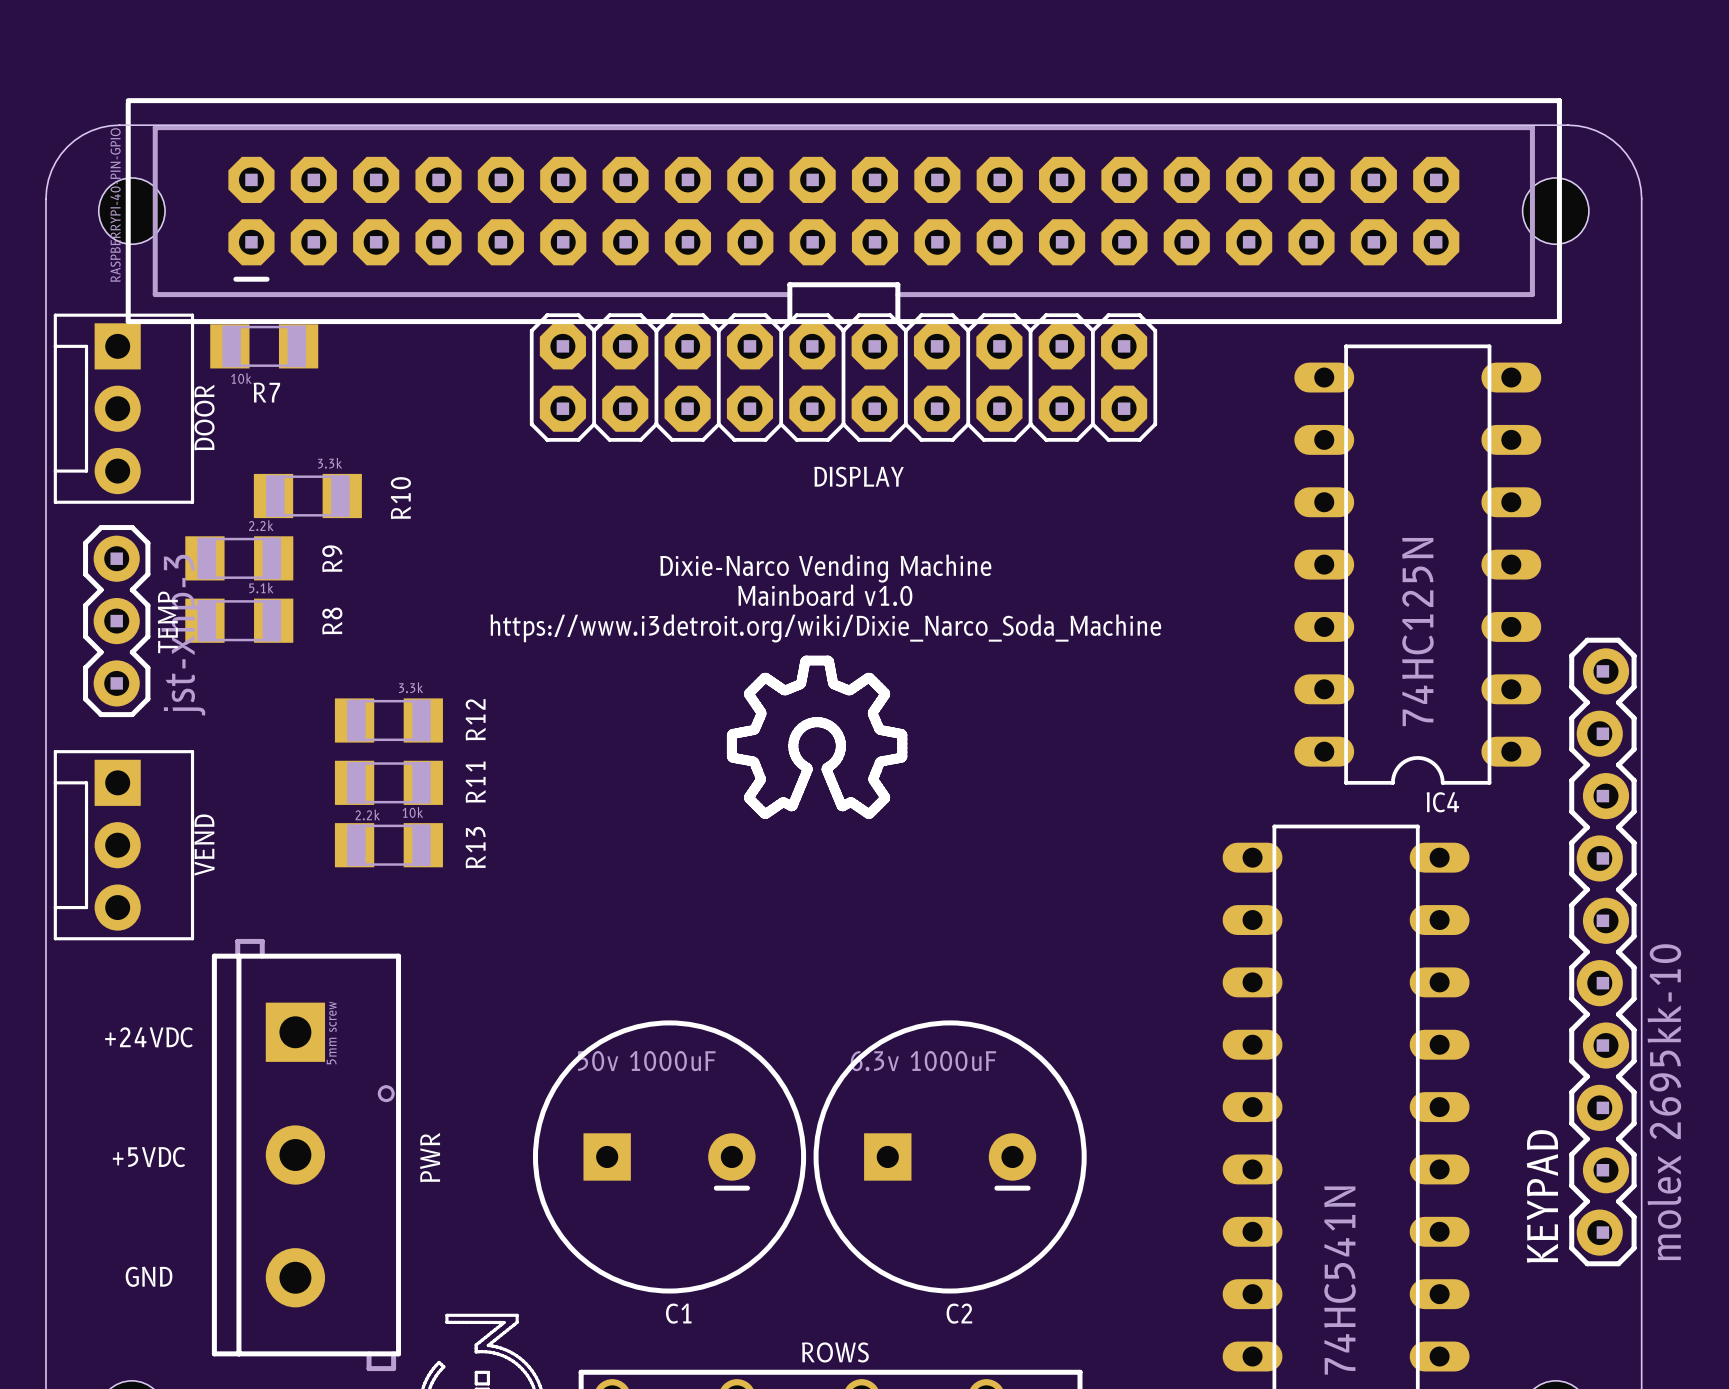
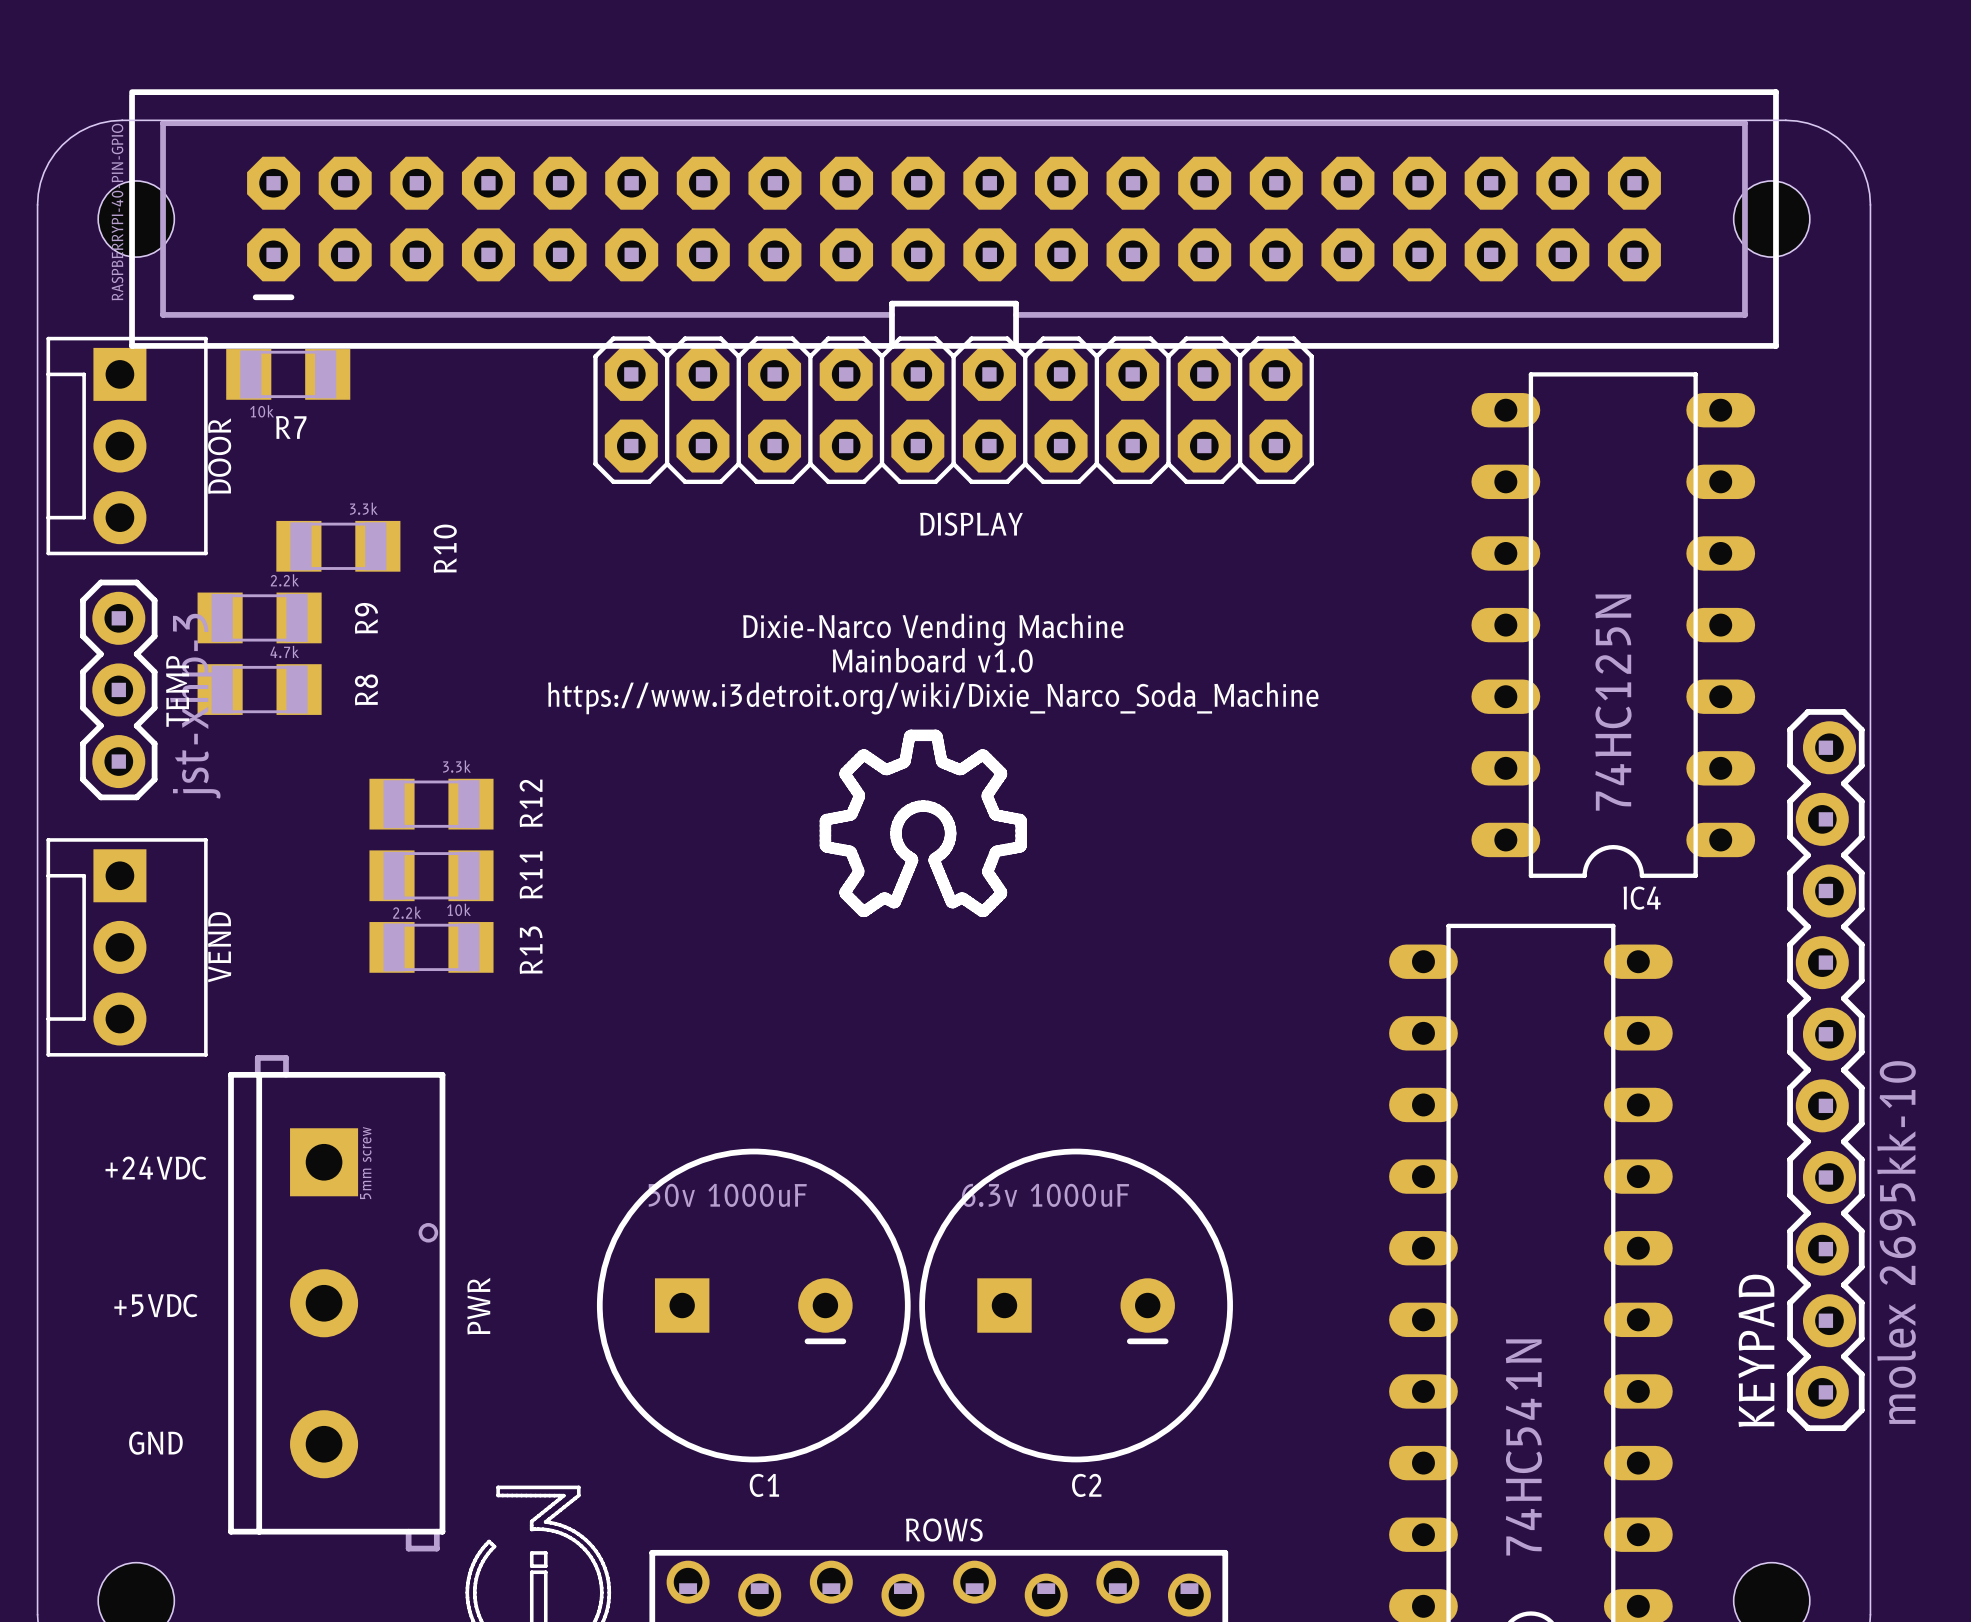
R8 value: 5.1k (261, 588) -> 4.7k (284, 651)

